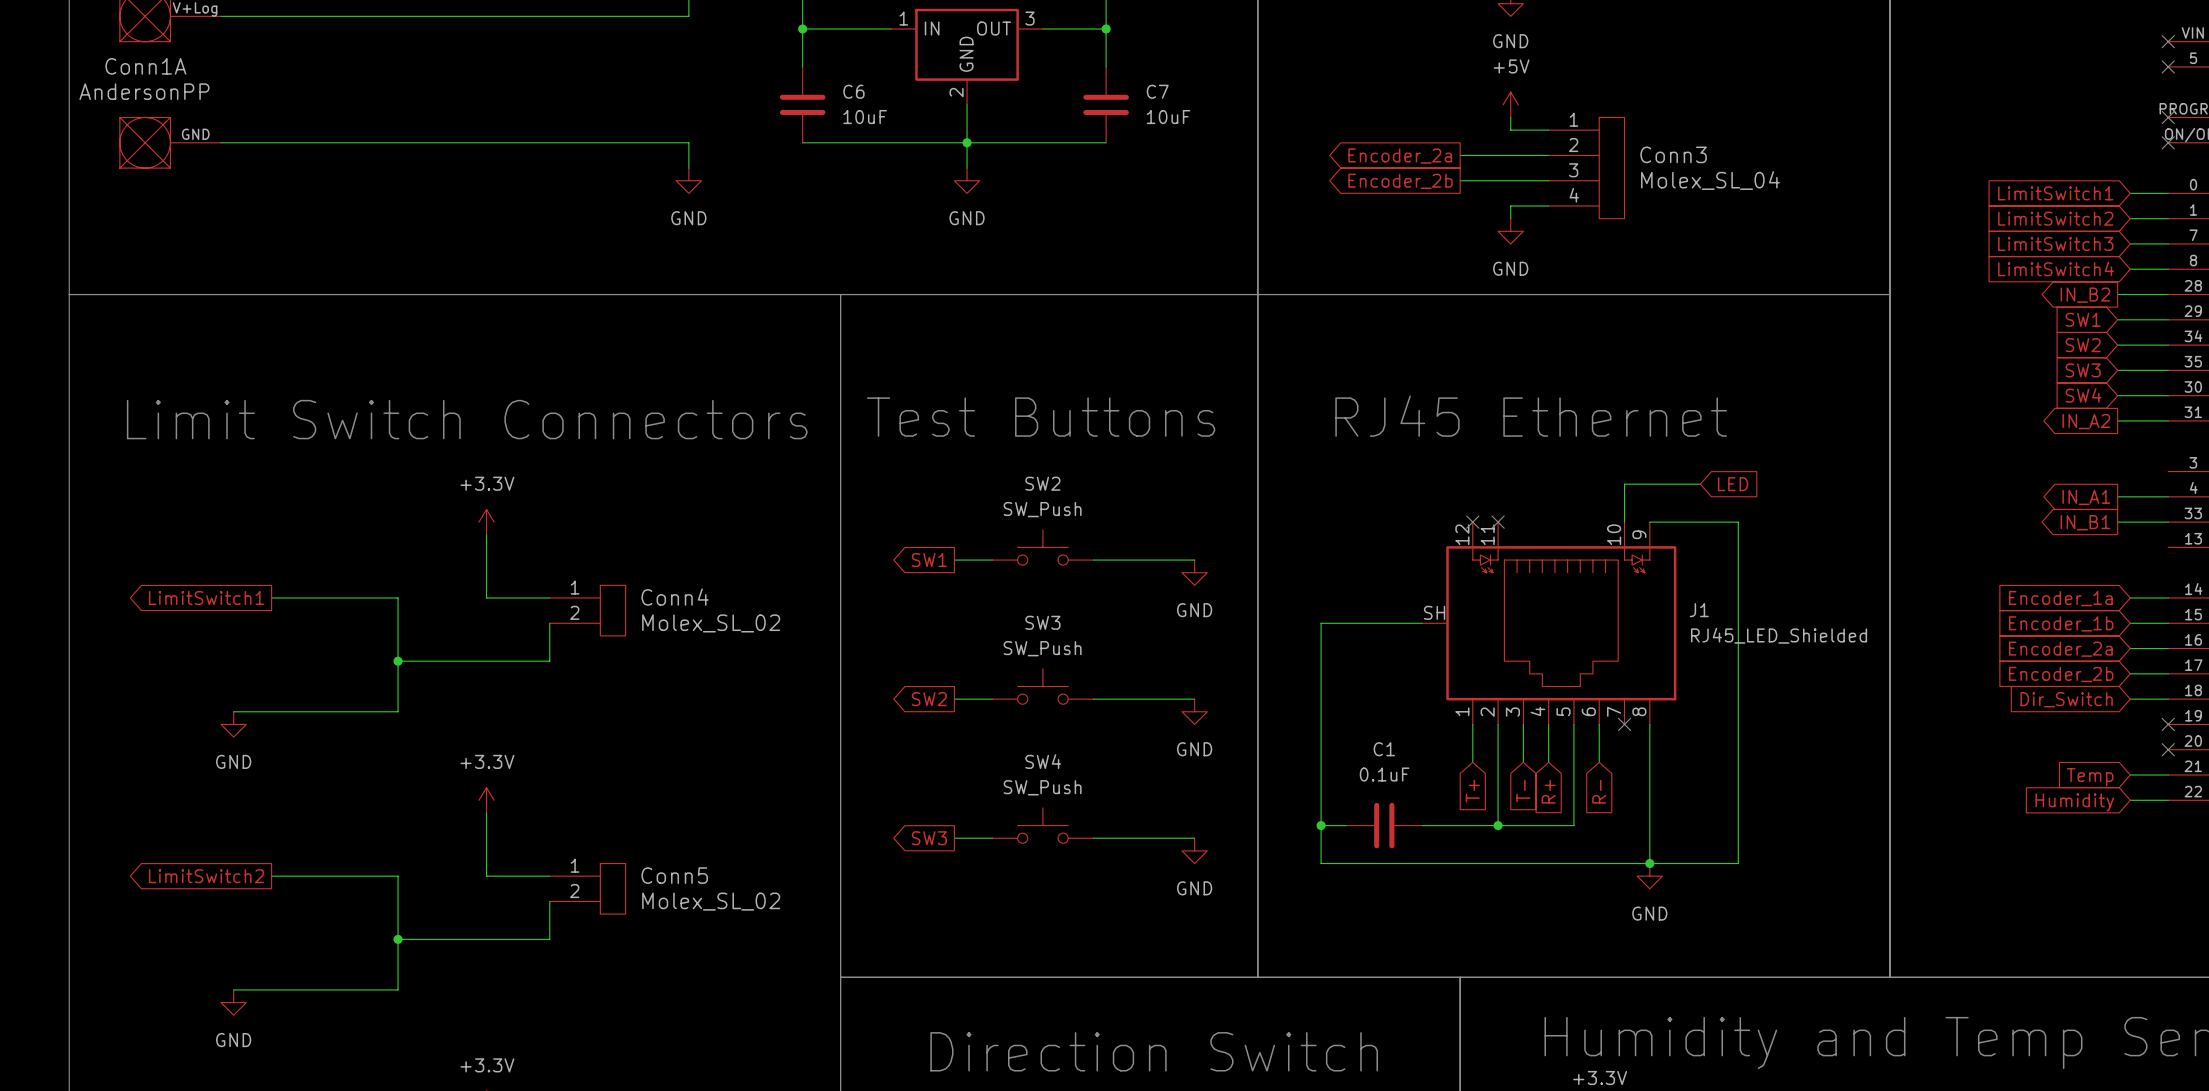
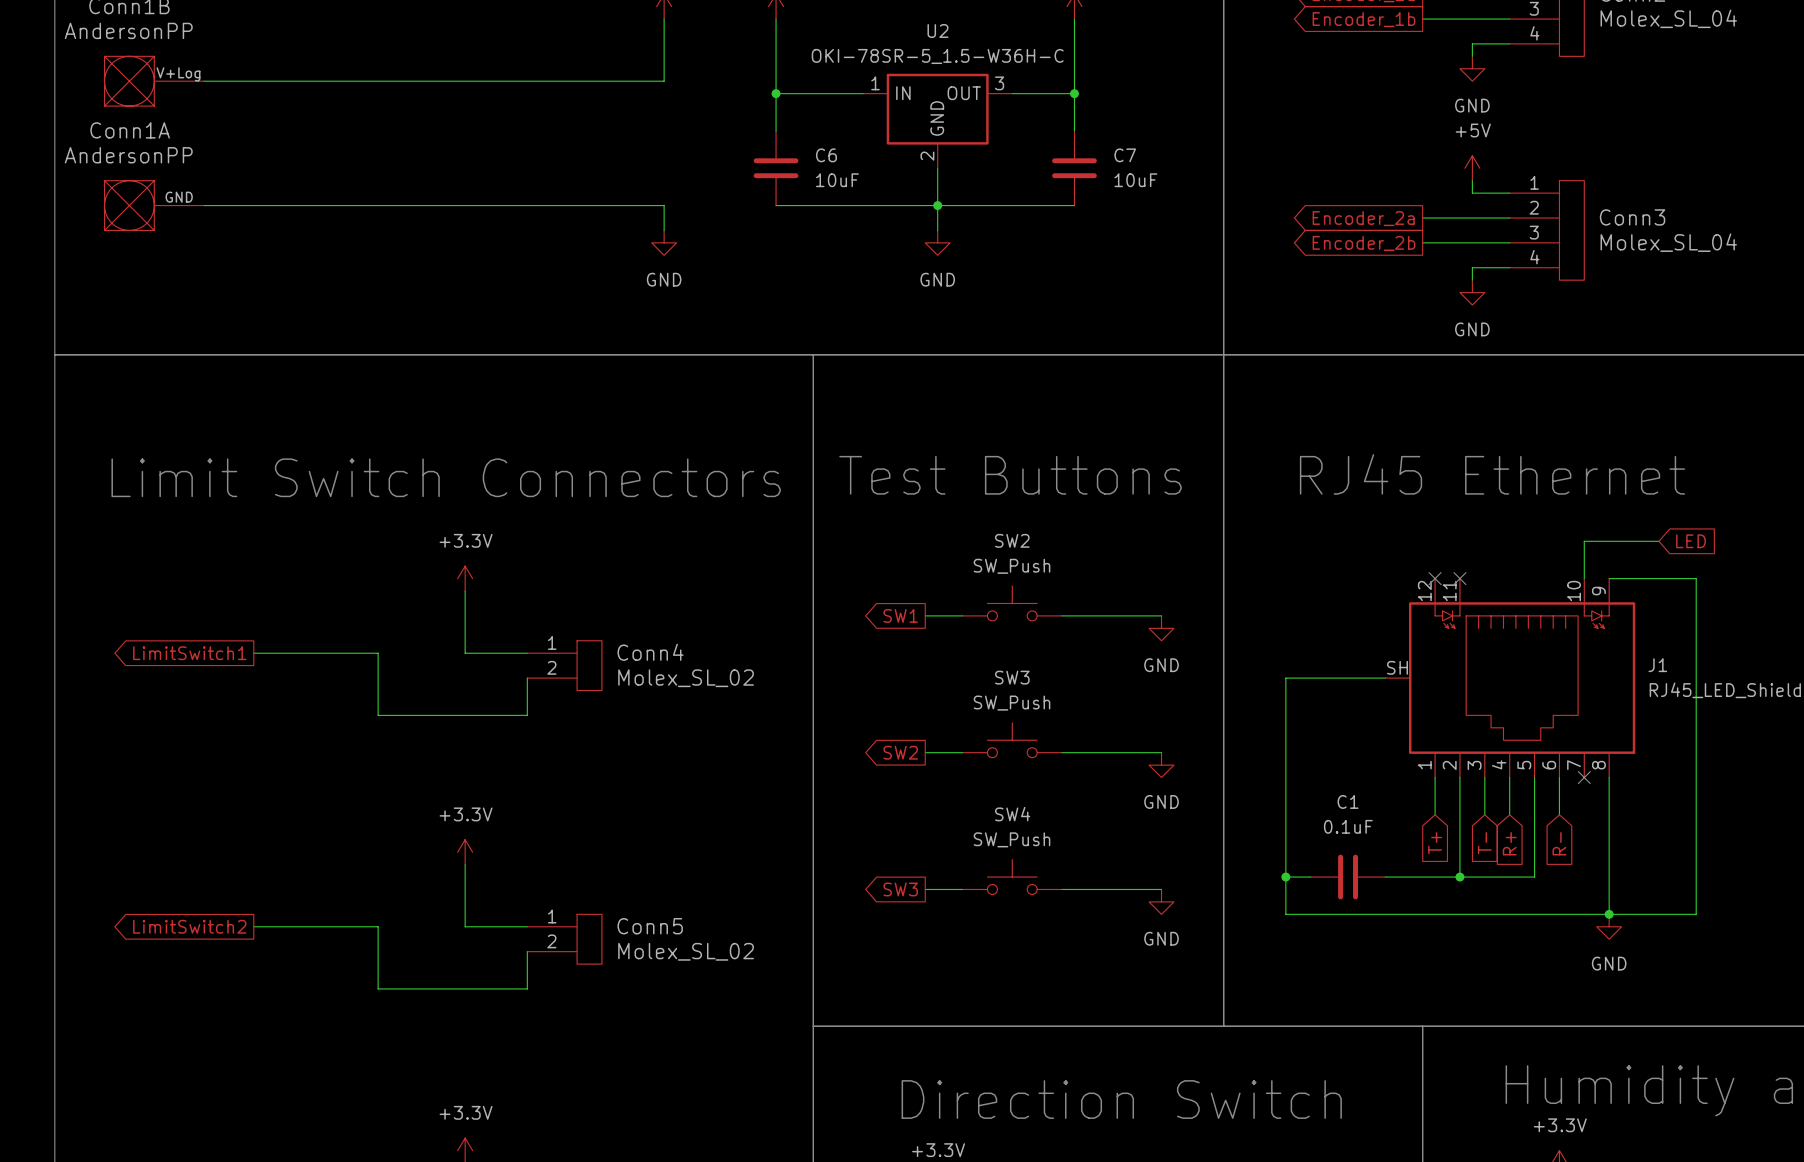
wire: (398, 661) (398, 711) (233, 711) -> none
junction: (398, 661) -> none
power symbol: GND (233, 724) -> none
wire: (398, 939) (398, 989) (233, 989) -> none
junction: (398, 939) -> none
power symbol: GND (233, 1002) -> none

